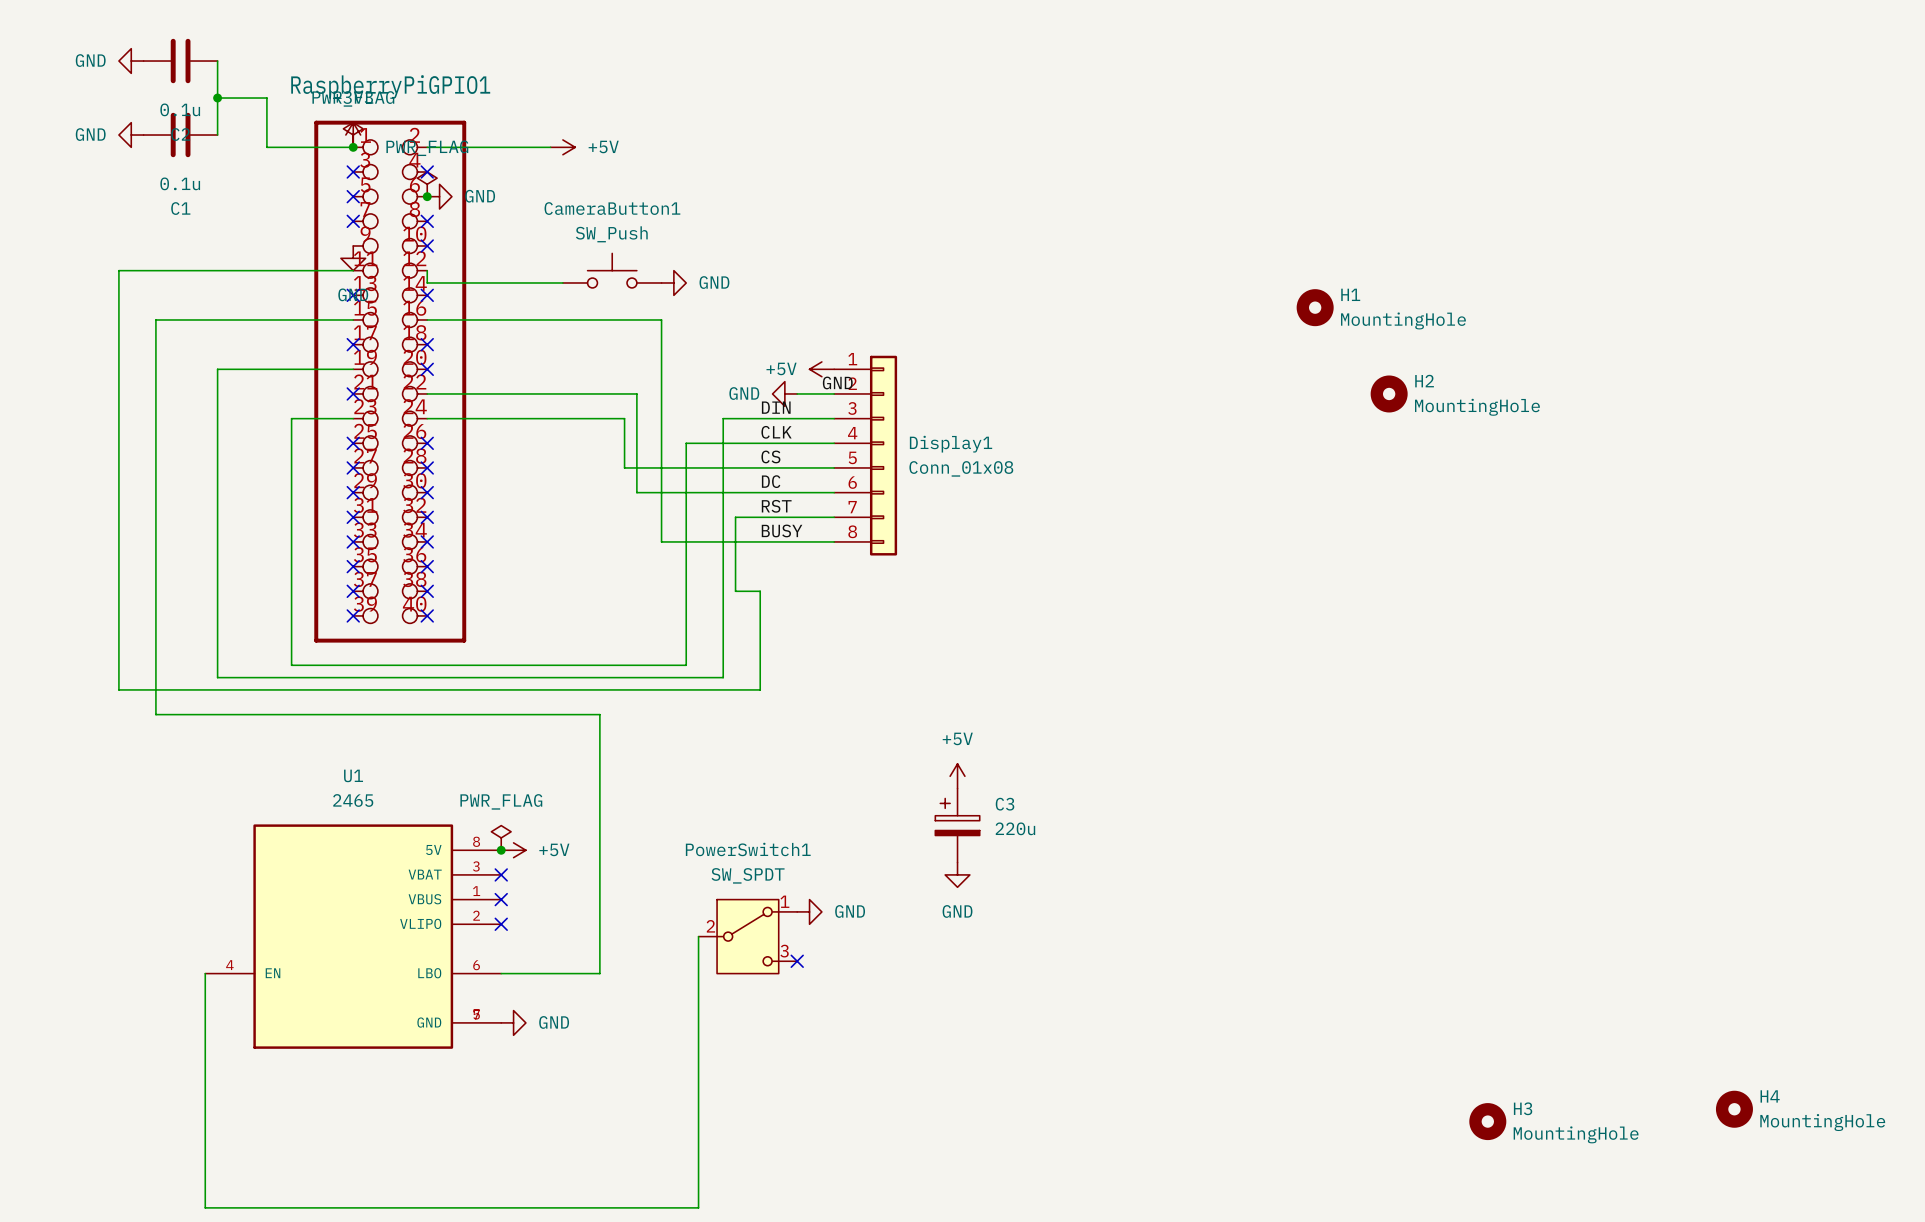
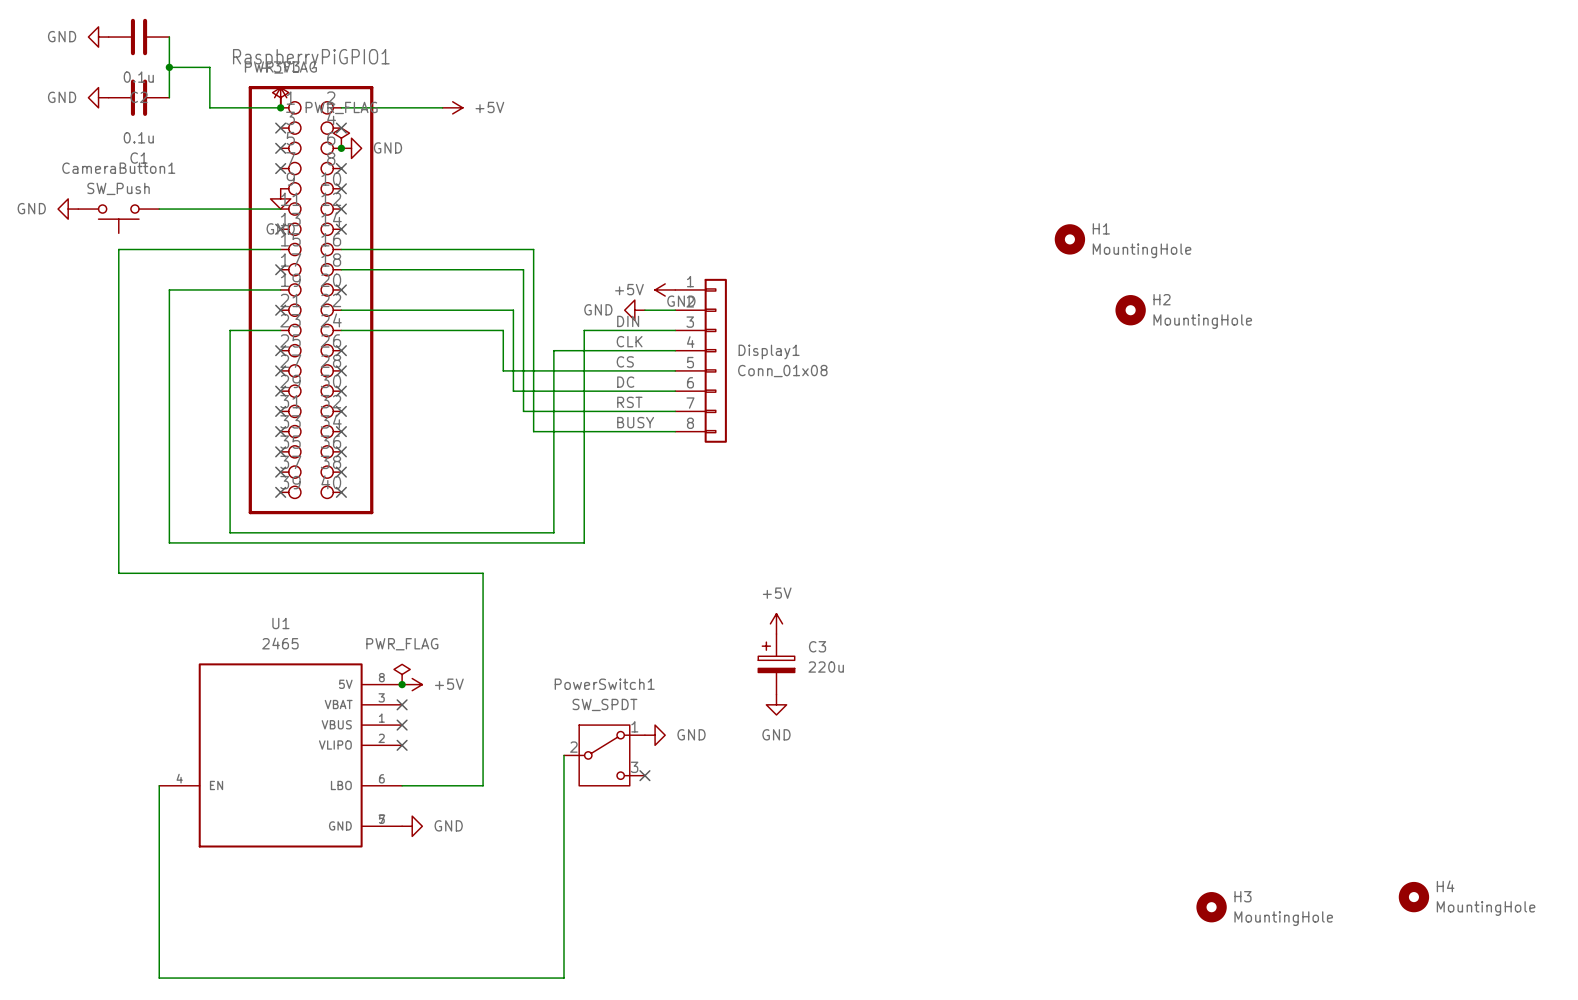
power symbol: none -> GND (68, 209)
wire: (205, 270) (118, 270) (118, 689) (760, 689) (760, 591) (735, 591) (735, 517) -> (341, 269) (523, 269) (523, 411) (594, 411)
wire: (427, 270) (427, 282) (562, 282) -> none
no-connect mark: none -> (341, 209)
CameraButton1 rotation: 0° (612, 270) -> 180° (118, 219)
CameraButton1 position: (612, 270) -> (118, 219)
power symbol: GND (673, 282) -> none
no-connect mark: (427, 344) -> none

